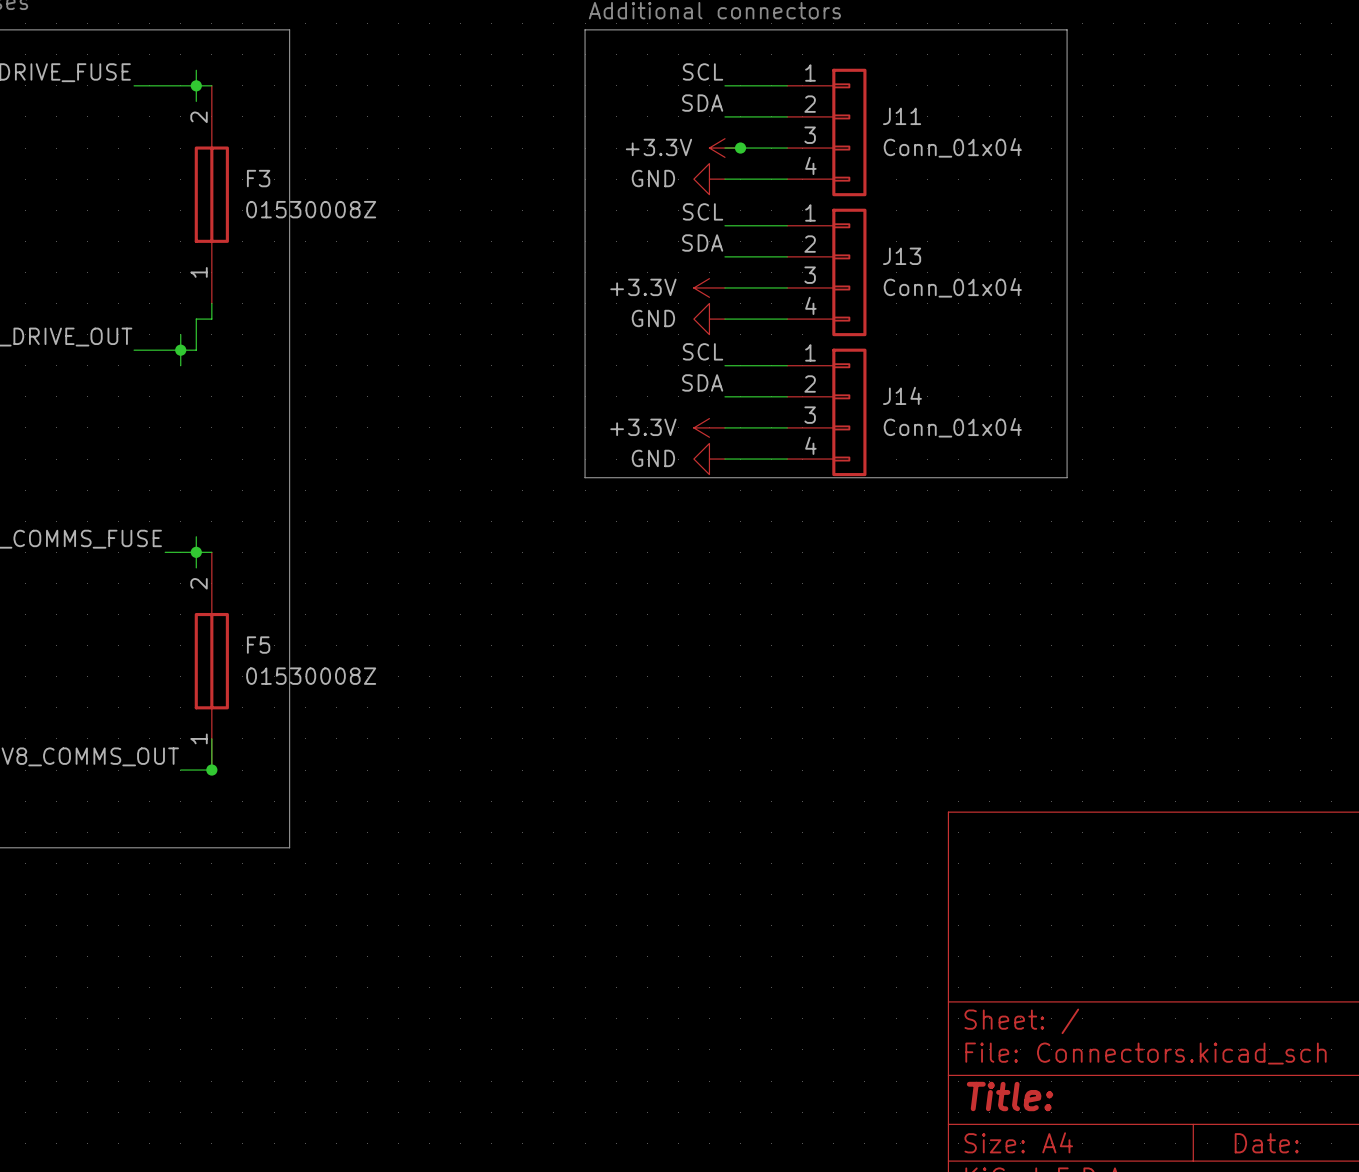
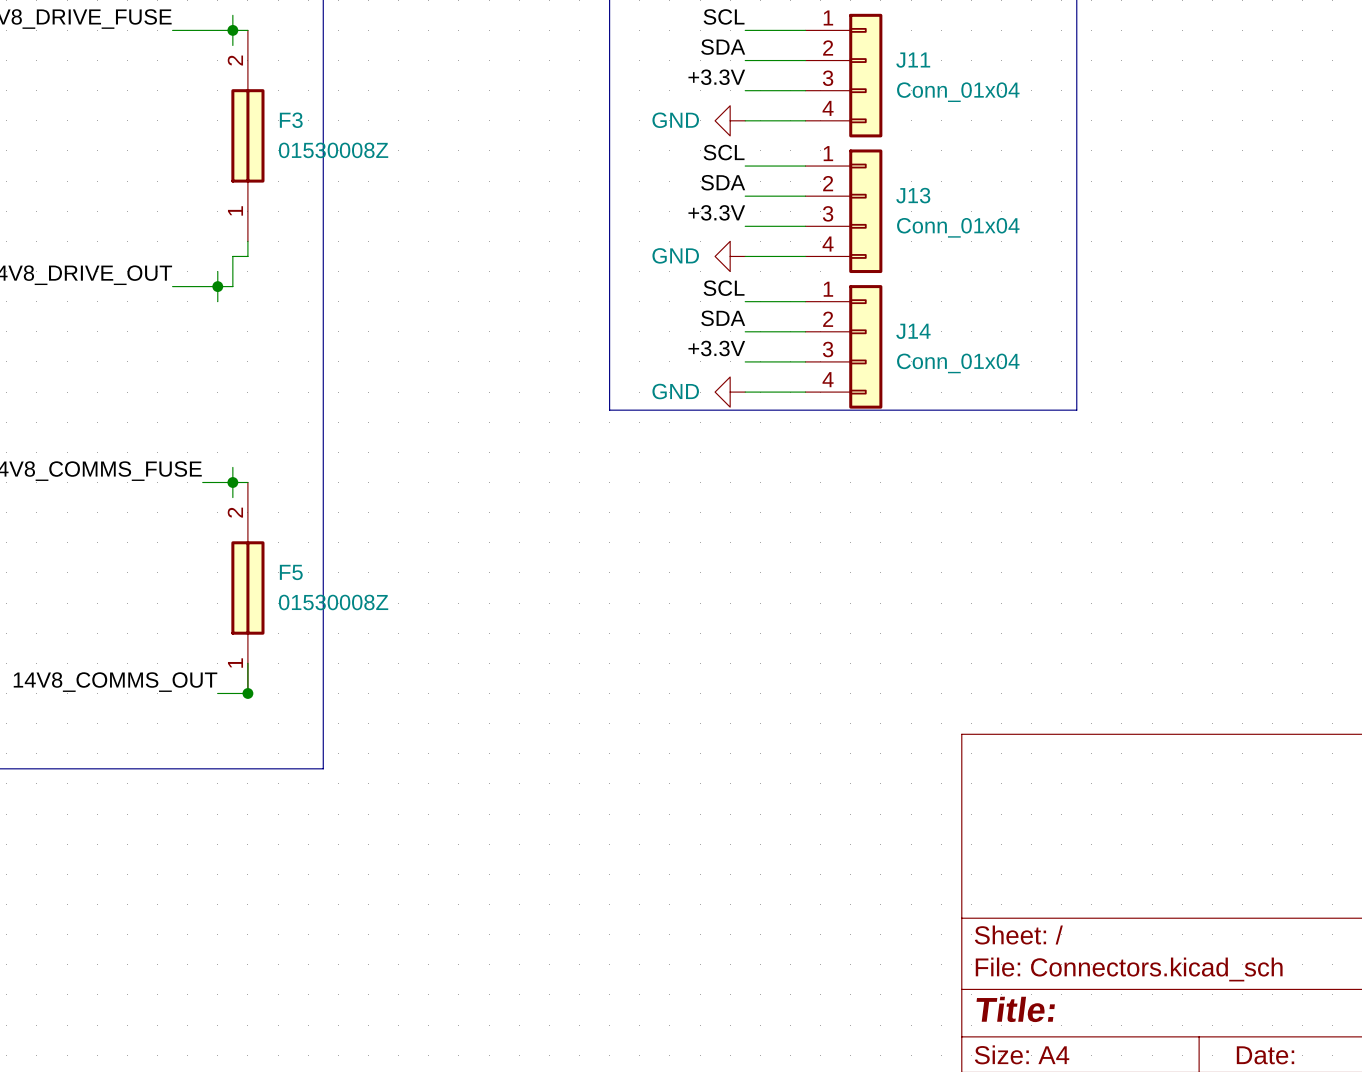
label: none -> +3.3V (716, 77)
power symbol: +3.3V (724, 148) -> none
junction: (740, 148) -> none
label: none -> +3.3V (716, 212)
power symbol: +3.3V (709, 287) -> none
label: none -> +3.3V (716, 348)
power symbol: +3.3V (709, 427) -> none

